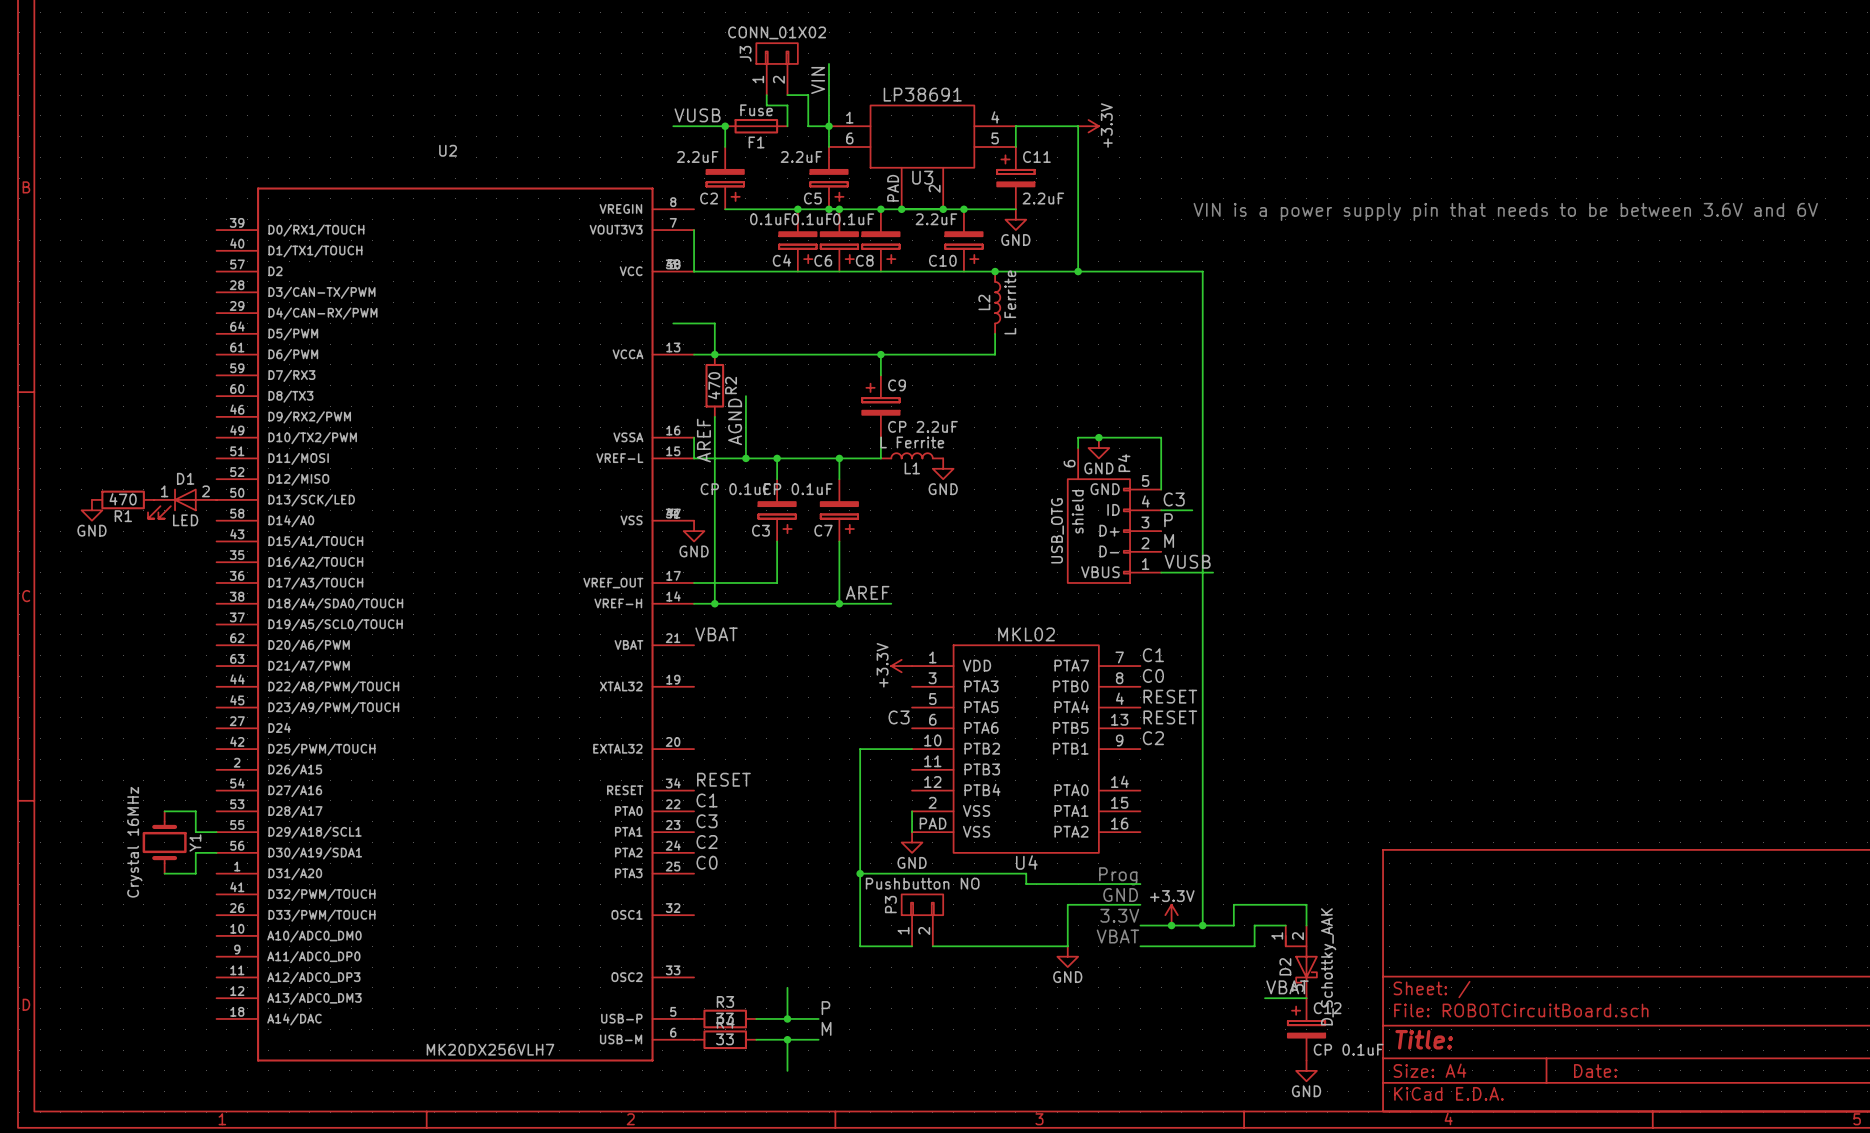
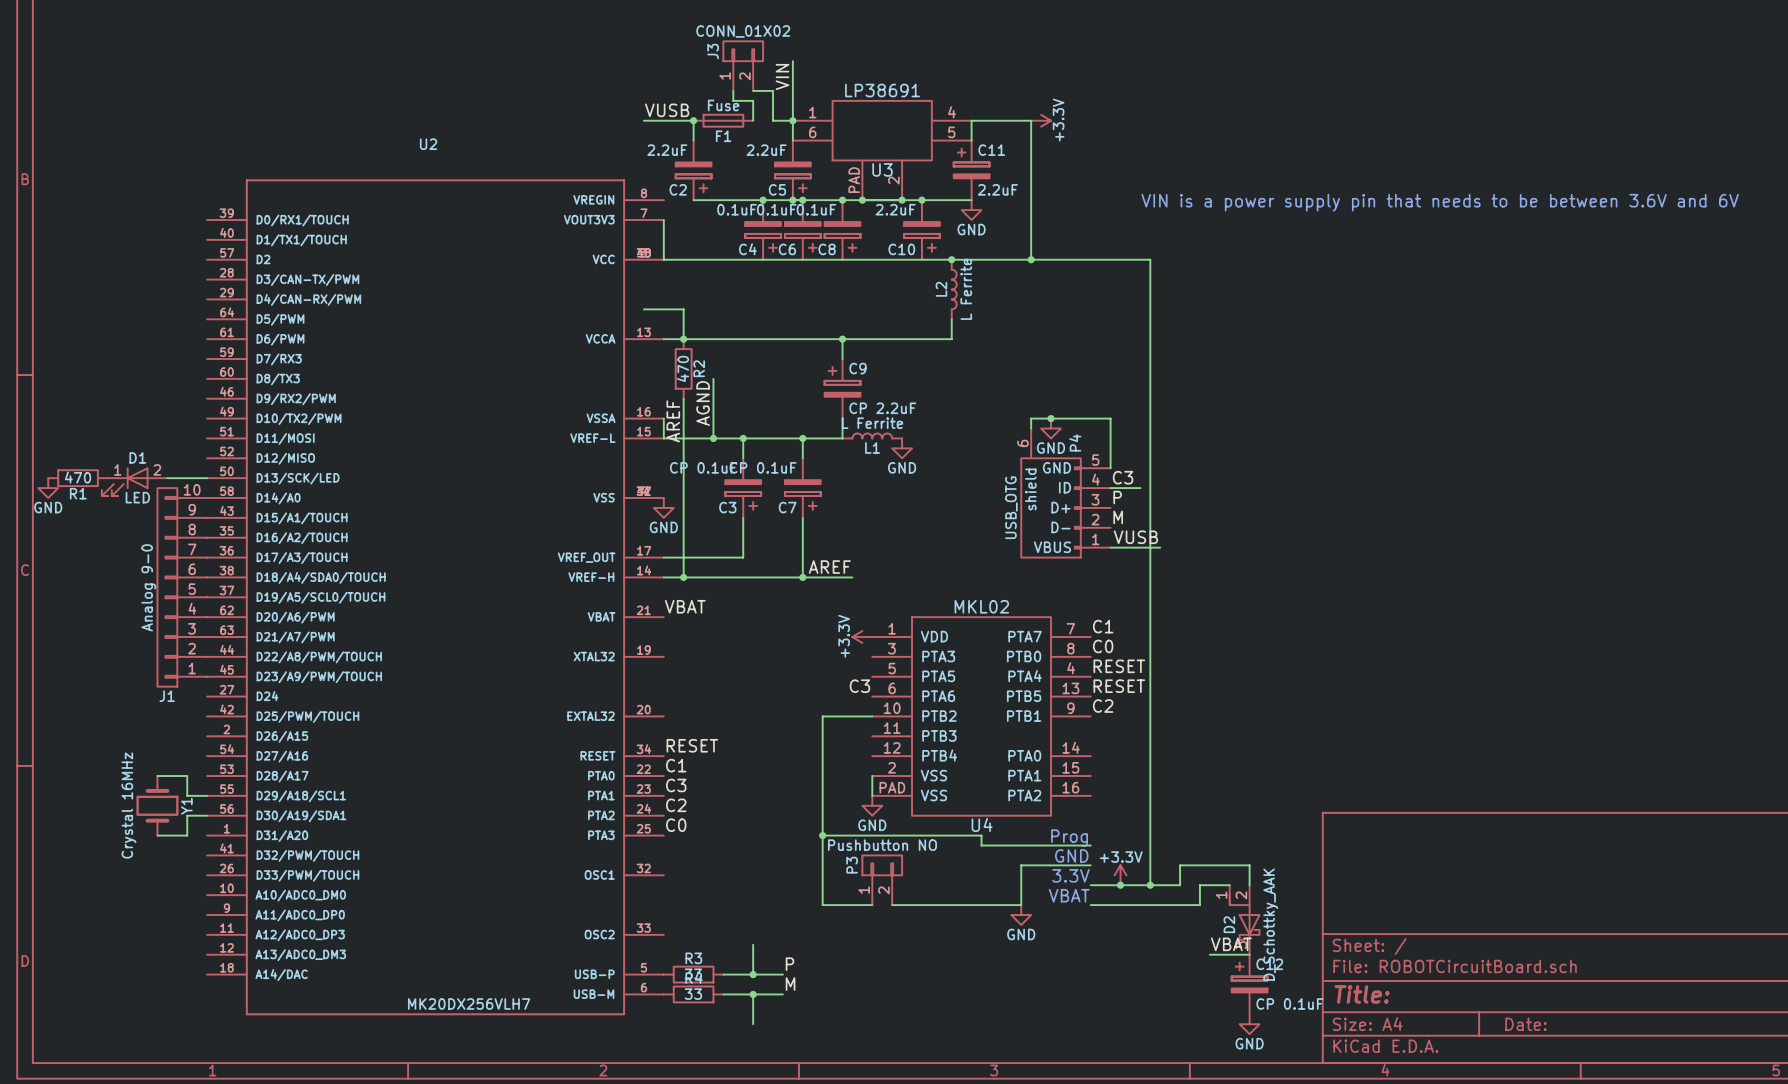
R1 position: (123, 499) -> (78, 478)
D1 position: (182, 503) -> (134, 481)
power symbol position: GND (91, 510) -> GND (48, 488)
J1: none -> Analog 9-0 (182, 587)

